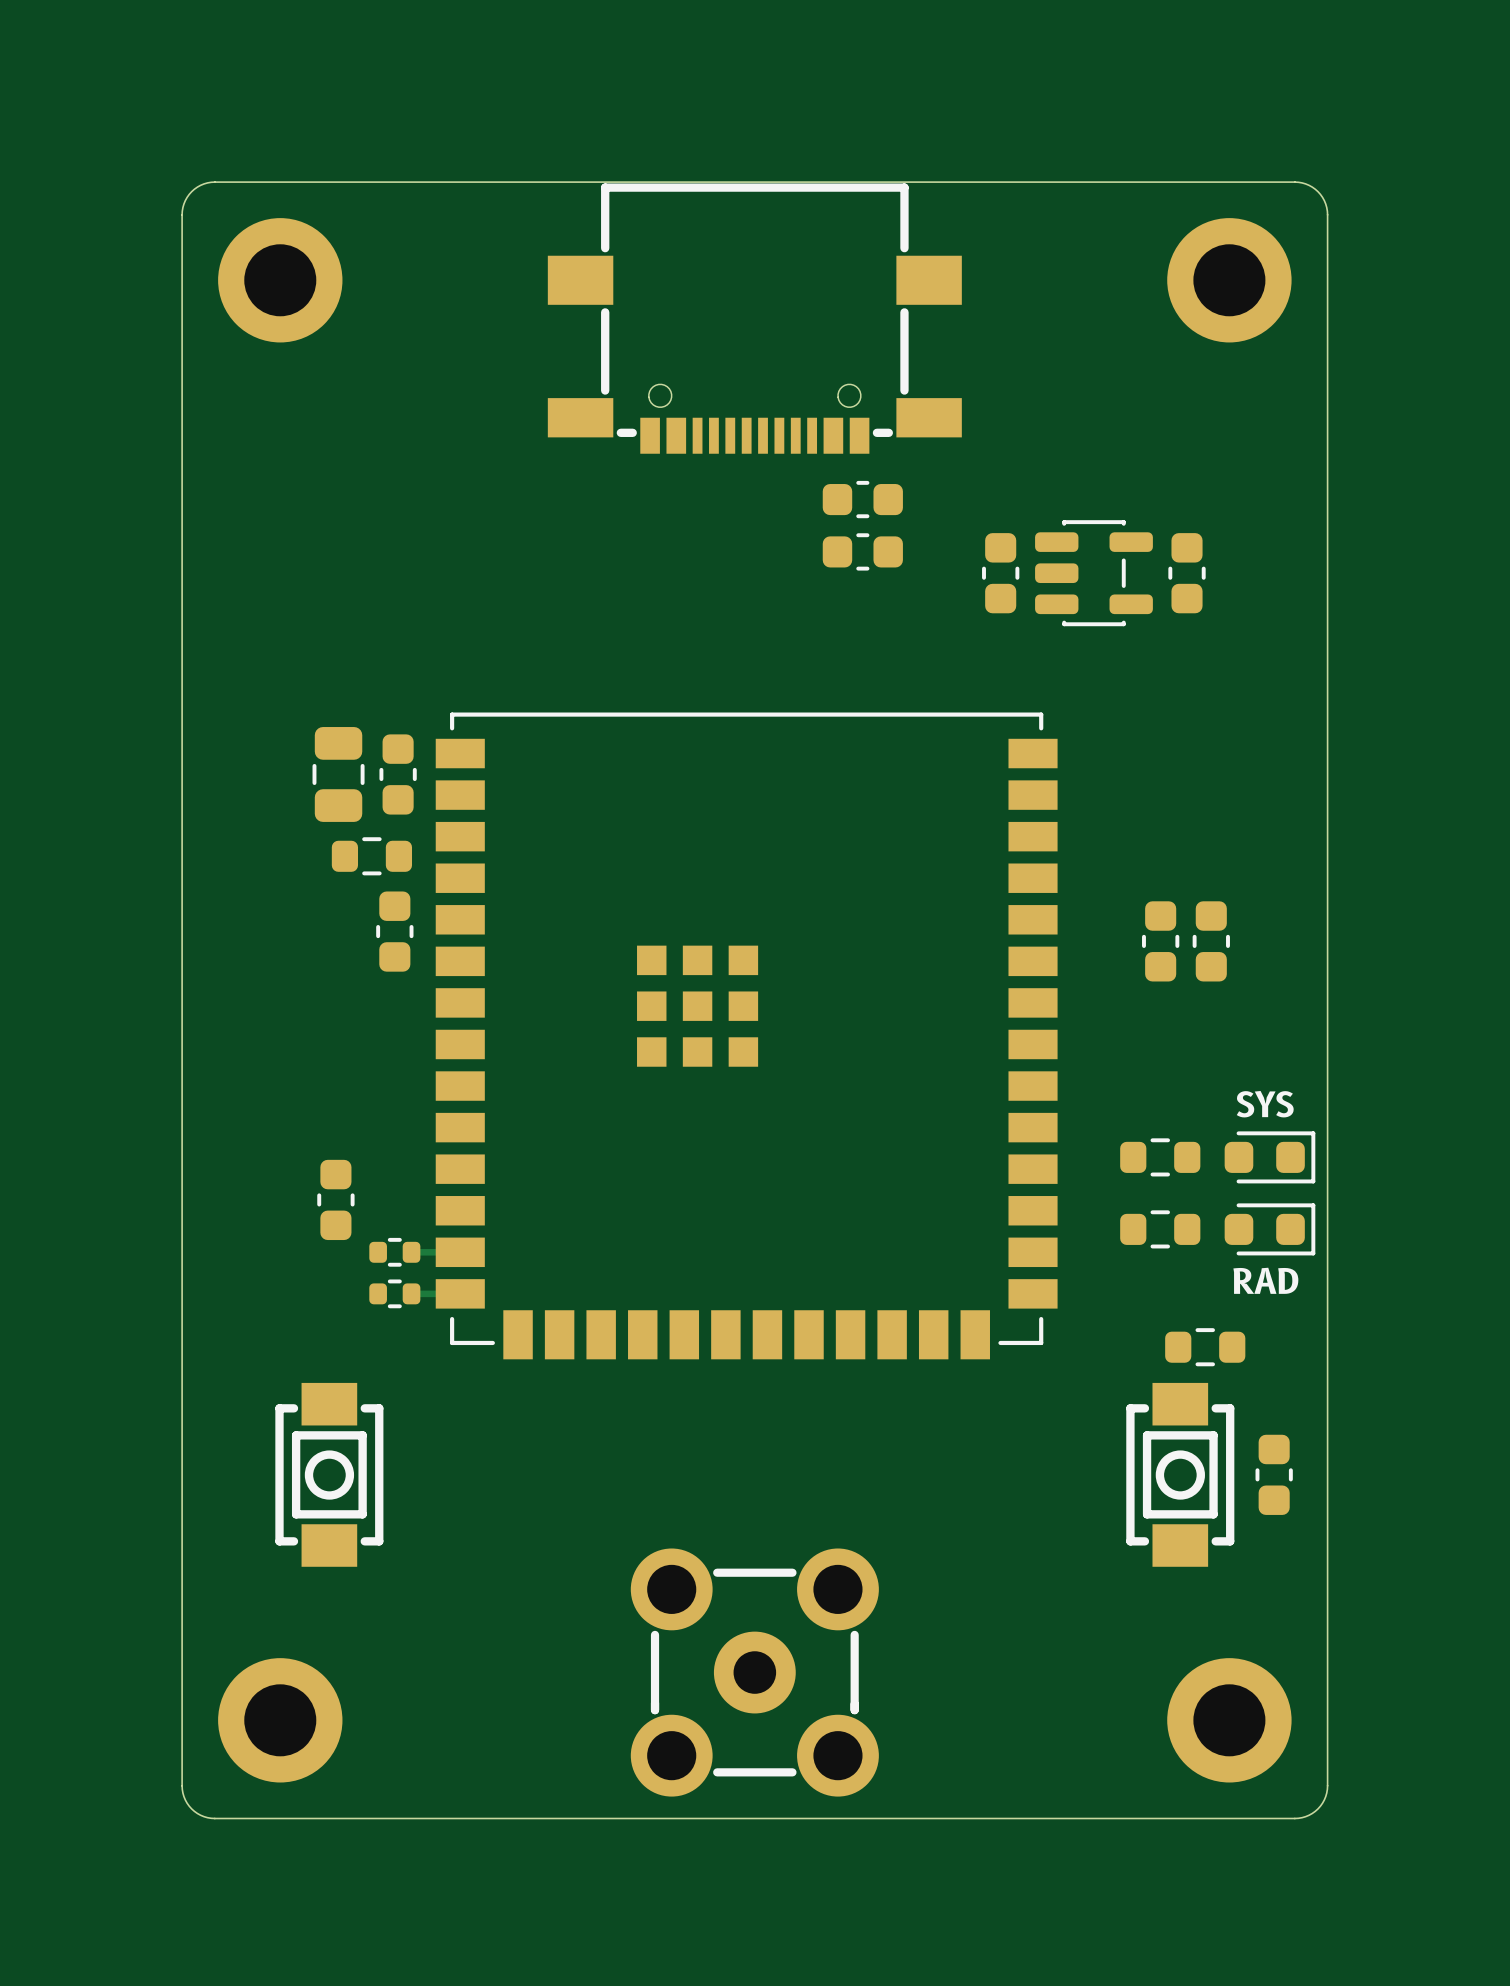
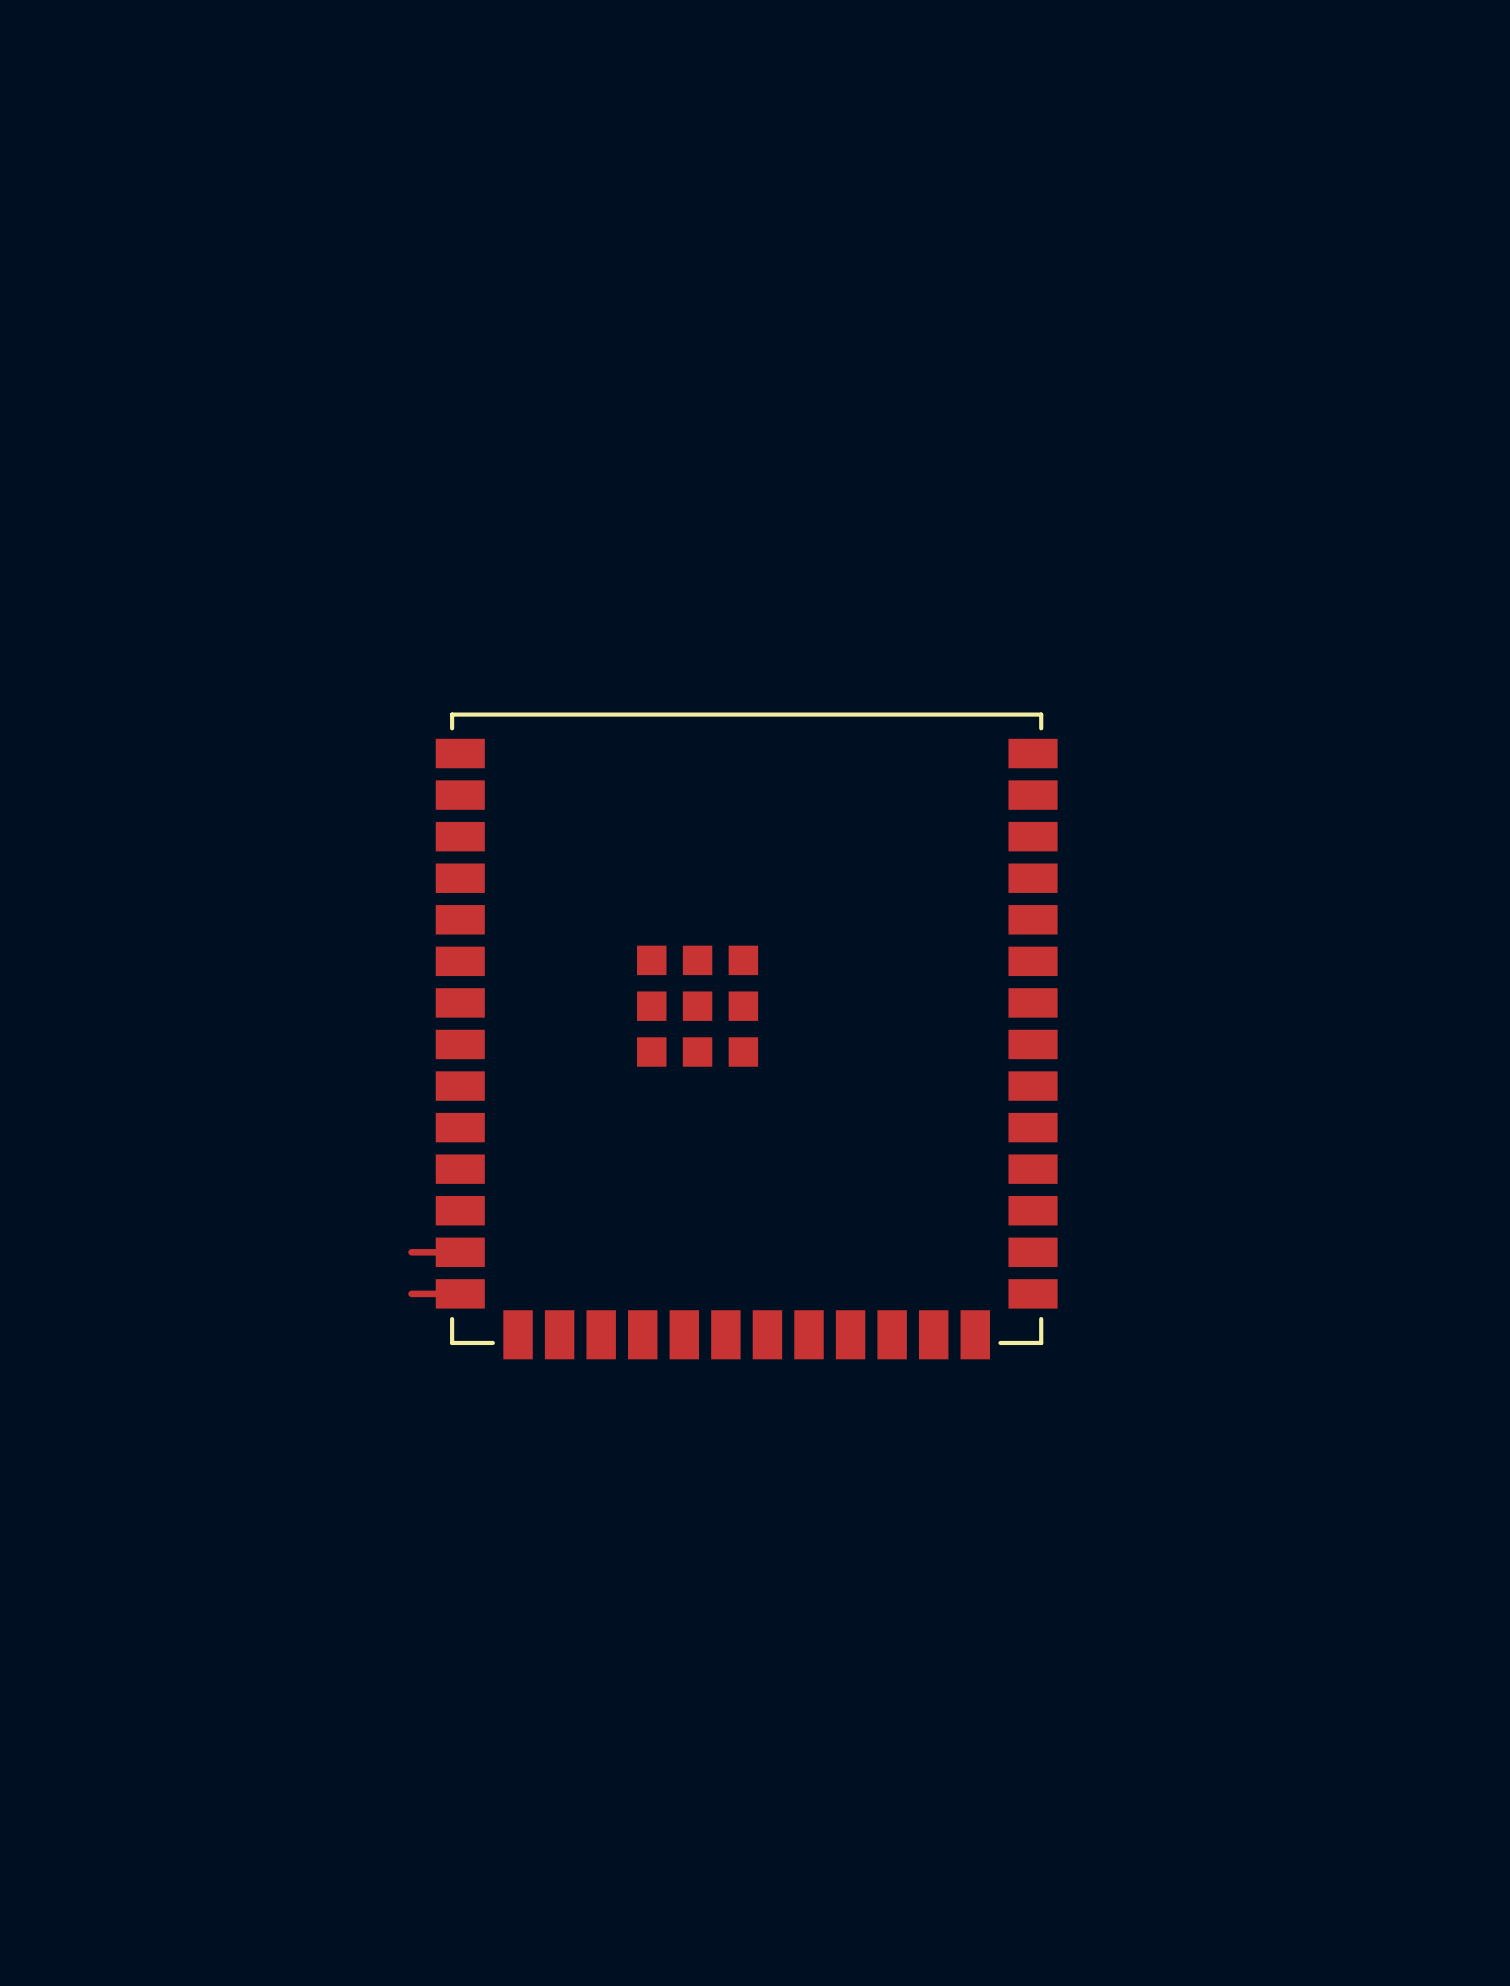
board edge: (214, 182) (1294, 182) (1312, 187) (1322, 197) (1327, 214) (1327, 1785) (1324, 1799) (1312, 1813) (1294, 1818) (214, 1818) (197, 1813) (187, 1803) (182, 1785) (182, 214) (185, 200) (191, 191) (204, 183) (214, 182) -> none
part: (280, 280) -> none
part: (1229, 280) -> none
part: (754, 318) -> none
part: (862, 499) -> none
part: (862, 551) -> none
part: (1000, 573) -> none
part: (1093, 573) -> none
part: (1187, 573) -> none
part: (338, 774) -> none
part: (398, 774) -> none
part: (371, 856) -> none
part: (394, 931) -> none
part: (1160, 941) -> none
part: (1211, 941) -> none
text: SYS (1265, 1104) -> none
part: (1160, 1157) -> none
part: (1269, 1157) -> none
part: (335, 1199) -> none
part: (1160, 1229) -> none
part: (1269, 1229) -> none
part: (394, 1252) -> none
text: RAD (1265, 1280) -> none
part: (394, 1293) -> none
part: (1205, 1347) -> none
part: (329, 1474) -> none
part: (1180, 1474) -> none
part: (1274, 1474) -> none
part: (754, 1672) -> none
part: (280, 1720) -> none
part: (1229, 1720) -> none

